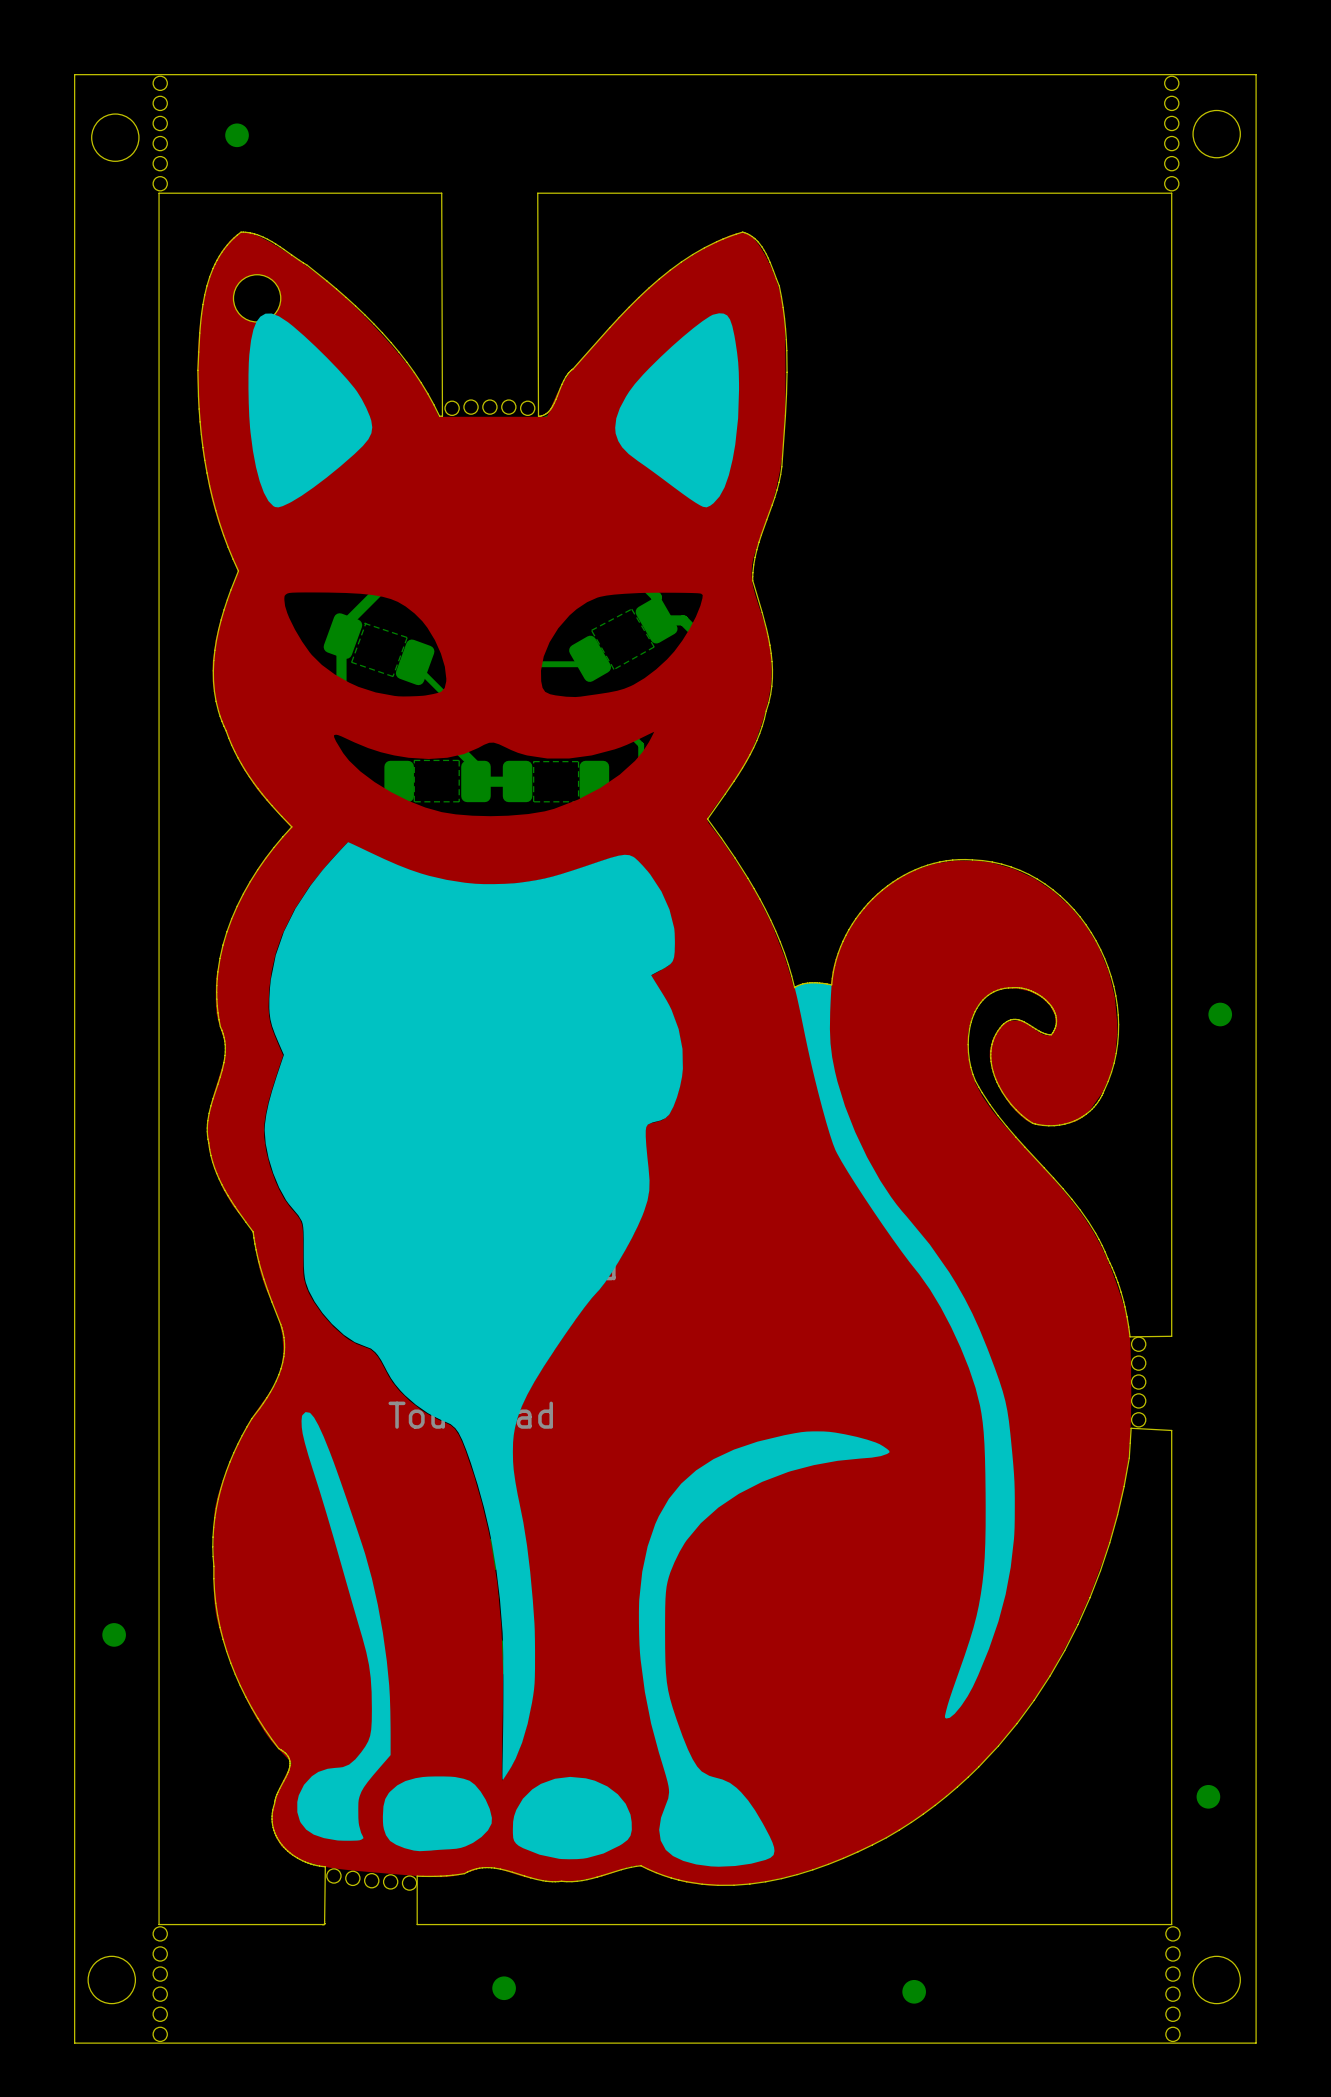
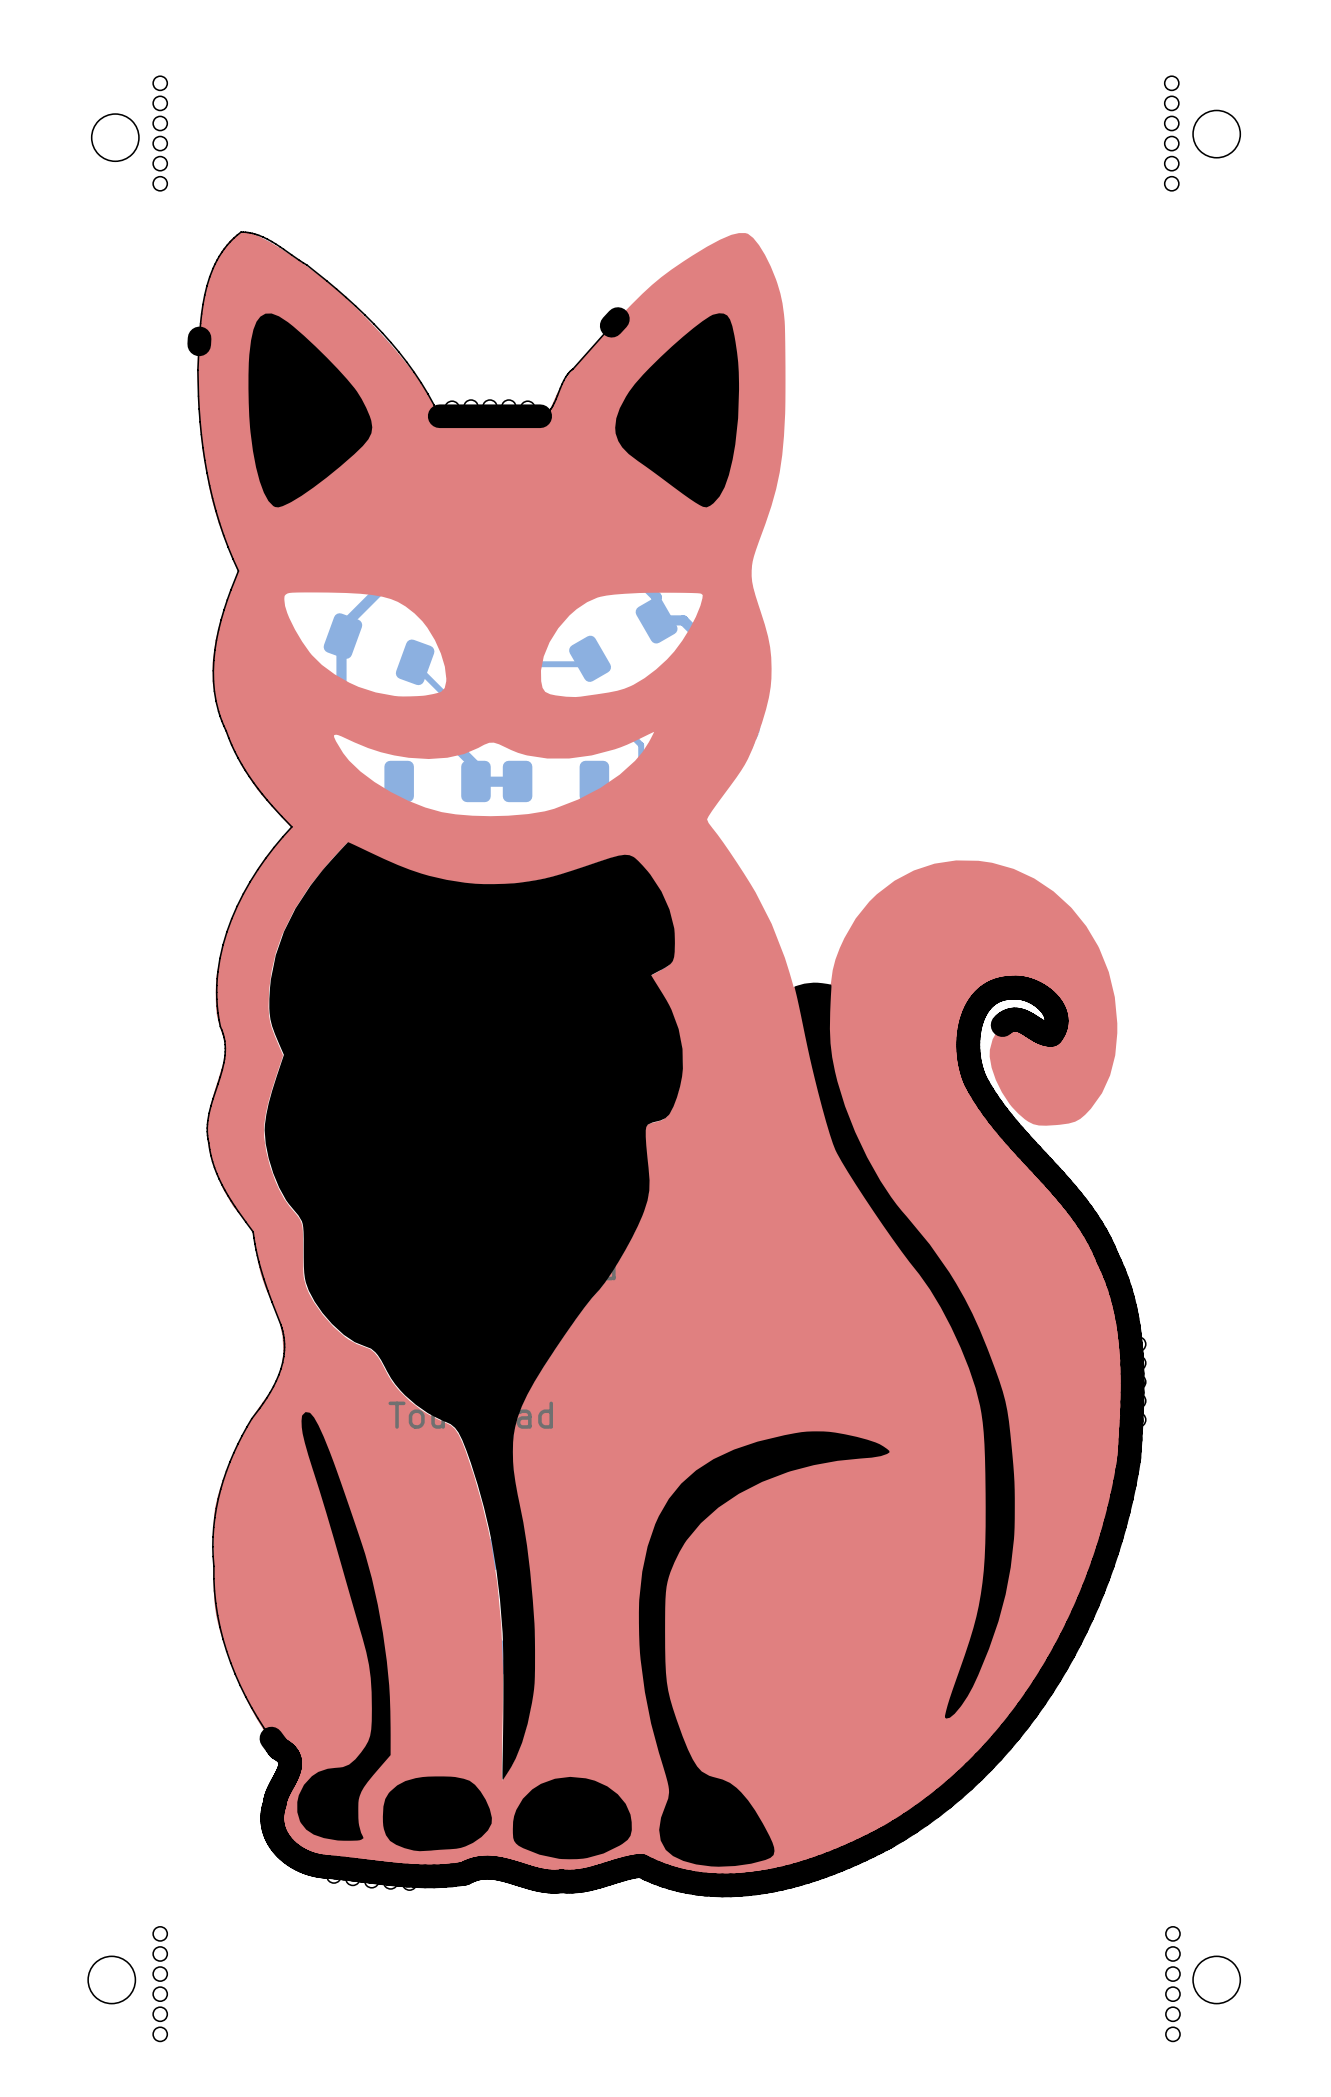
board edge: (74, 74) (74, 2043) (1256, 2043) (1256, 74) (74, 74) -> none
part: (237, 135) -> none
part: (257, 298) -> none
board edge width: thin (619, 317) (609, 327) -> thick (619, 317) (609, 327)
board edge: (617, 319) (648, 288) (681, 262) (716, 241) (742, 232) (753, 237) (761, 246) (779, 286) (786, 350) (786, 393) (781, 466) (777, 489) (756, 549) (752, 576) (769, 645) (771, 686) (762, 726) (753, 747) (738, 774) (707, 819) (735, 858) (765, 909) (784, 953) (794, 987) (809, 982) (831, 984) (840, 947) (859, 913) (877, 894) (892, 882) (927, 865) (959, 859) (1001, 864) (1028, 874) (1060, 895) (1080, 916) (1096, 941) (1108, 967) (1115, 995) (1118, 1024) (1117, 1043) (1111, 1072) (1101, 1095) (1094, 1106) (1081, 1117) (1069, 1122) (1054, 1125) (1032, 1123) (1016, 1110) (1006, 1098) (995, 1079) (991, 1061) (992, 1044) (997, 1031) (1005, 1022) (1015, 1019) (1024, 1022) (1043, 1033) (1051, 1034) (1056, 1023) (1055, 1013) (1049, 1003) (1037, 994) (1024, 988) (1008, 987) (997, 990) (988, 995) (978, 1005) (972, 1018) (968, 1036) (970, 1067) (978, 1086) (997, 1115) (1071, 1199) (1095, 1233) (1119, 1287) (1130, 1336) (1171, 1336) (1171, 193) (537, 193) (538, 416) -> none
board edge width: thin (199, 333) (198, 352) -> thick (199, 333) (198, 352)
board edge: none -> (439, 416) (540, 416)
board edge: (442, 416) (441, 193) (159, 193) (159, 1924) (322, 1924) -> none
bottom zone outline: (631, 609) (591, 630) (614, 669) (654, 646) (631, 609) -> none
bottom zone outline: (364, 623) (407, 637) (393, 676) (351, 662) (364, 623) -> none
bottom zone outline: (414, 760) (459, 760) (459, 801) (414, 801) (414, 760) -> none
bottom zone outline: (533, 761) (578, 761) (578, 801) (533, 801) (533, 761) -> none
part: (1220, 1014) -> none
board edge: (1131, 1428) (1129, 1458) (1124, 1486) (1109, 1542) (1089, 1597) (1064, 1650) (1034, 1700) (998, 1745) (957, 1786) (923, 1814) (886, 1837) (843, 1858) (797, 1874) (749, 1884) (718, 1885) (686, 1881) (663, 1875) (641, 1865) (571, 1881) (542, 1880) (488, 1867) (452, 1875) (417, 1876) (417, 1924) (1171, 1924) (1171, 1430) (1131, 1428) -> none
part: (114, 1634) -> none
board edge: (271, 1738) (278, 1748) (287, 1755) (290, 1763) (275, 1800) (272, 1816) (273, 1830) (280, 1842) (292, 1854) (308, 1863) (325, 1866) (324, 1923) -> (271, 1738) (278, 1748) (287, 1755) (289, 1760) (288, 1770) (276, 1797) (272, 1816) (275, 1835) (287, 1850) (304, 1861) (319, 1866) (416, 1876) (451, 1875) (487, 1867) (502, 1869) (545, 1881) (572, 1881) (641, 1865) (672, 1878) (705, 1884) (739, 1885) (772, 1880) (830, 1863) (886, 1837) (932, 1807) (974, 1771) (1002, 1741) (1035, 1698) (1064, 1651) (1088, 1601) (1107, 1550) (1121, 1497) (1129, 1458) (1132, 1411) (1132, 1364) (1127, 1318) (1117, 1282) (1104, 1250) (1092, 1227) (1072, 1199) (992, 1108) (975, 1080) (969, 1062) (968, 1038) (972, 1018) (981, 1002) (992, 992) (1007, 988) (1027, 989) (1045, 1000) (1055, 1014) (1056, 1024) (1051, 1034) (1043, 1033) (1017, 1019) (1009, 1020) (1002, 1025)
part: (1208, 1796) -> none
board edge: (323, 1924) (323, 1924) -> none
part: (504, 1988) -> none
part: (914, 1991) -> none

